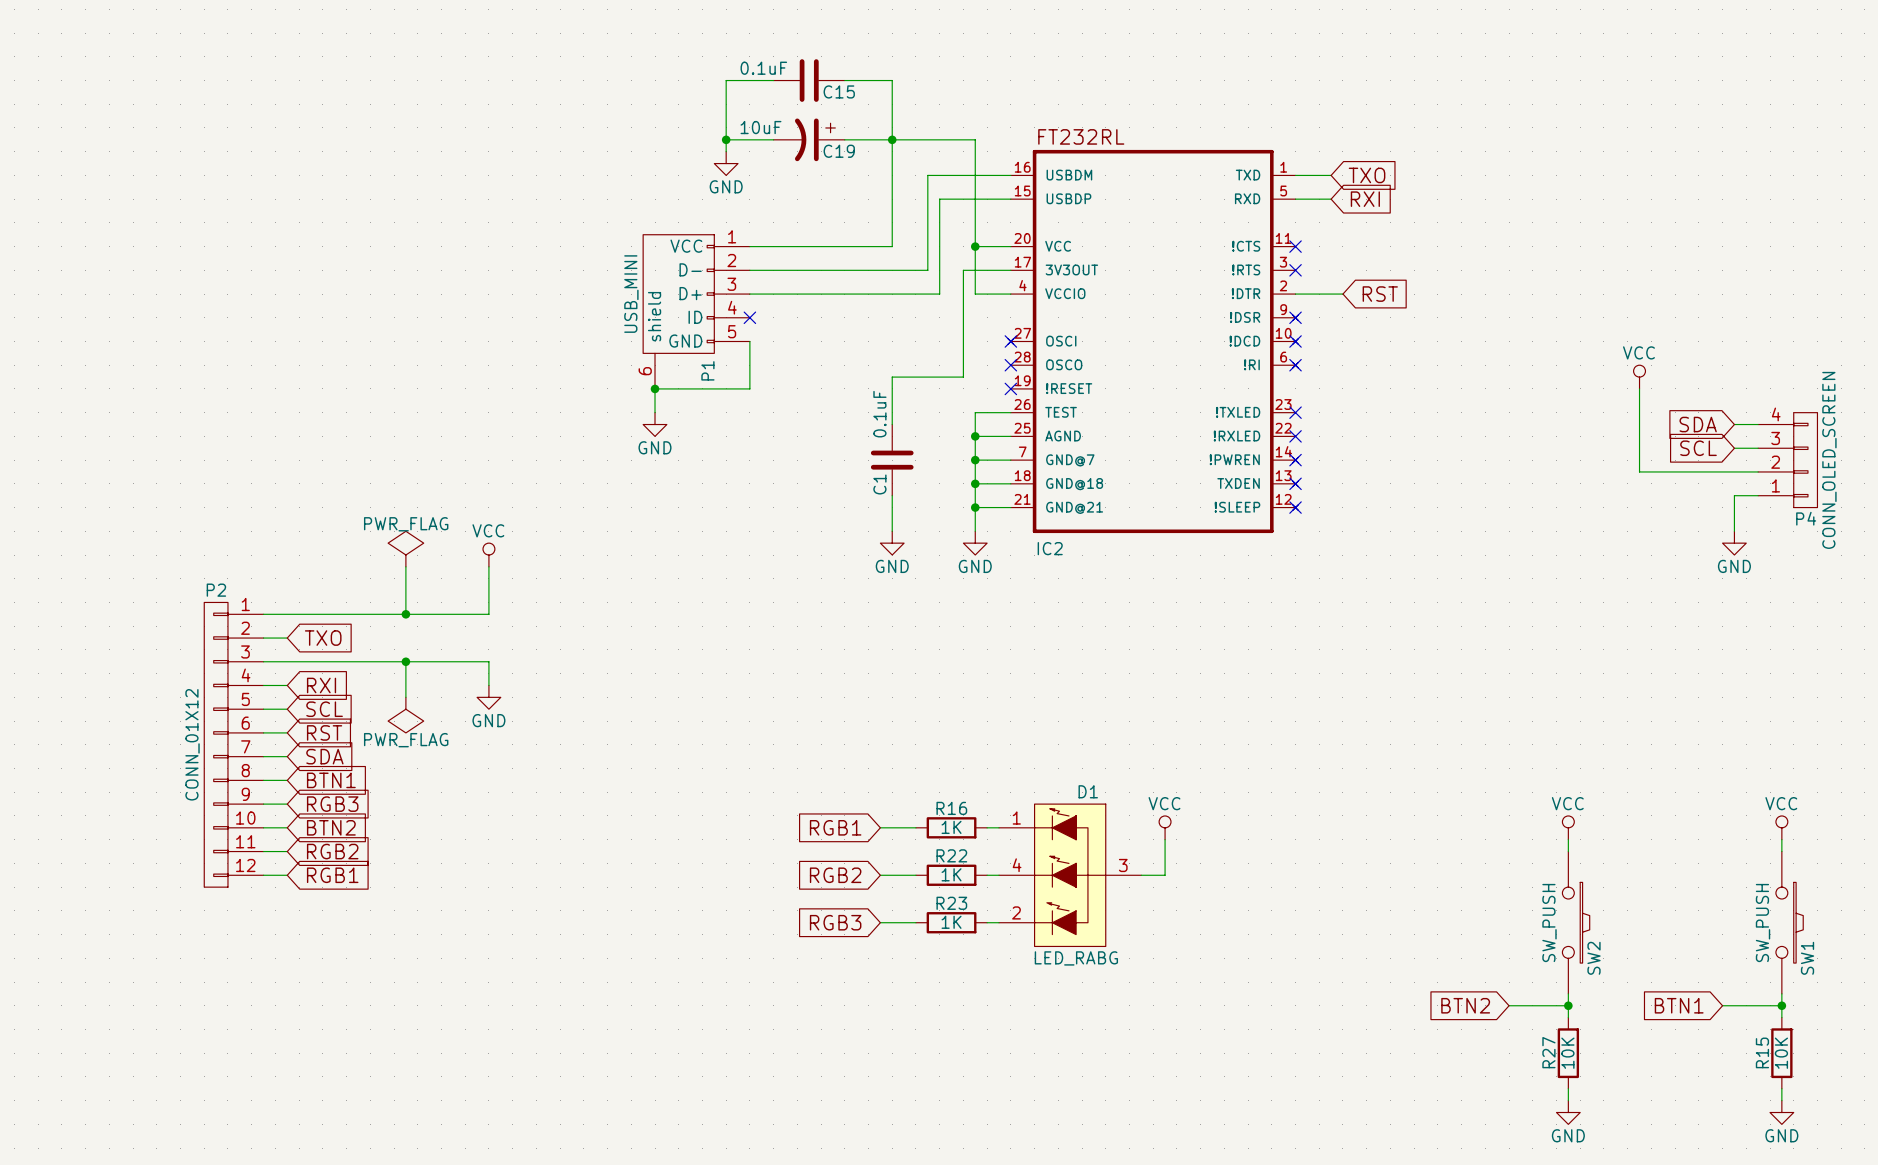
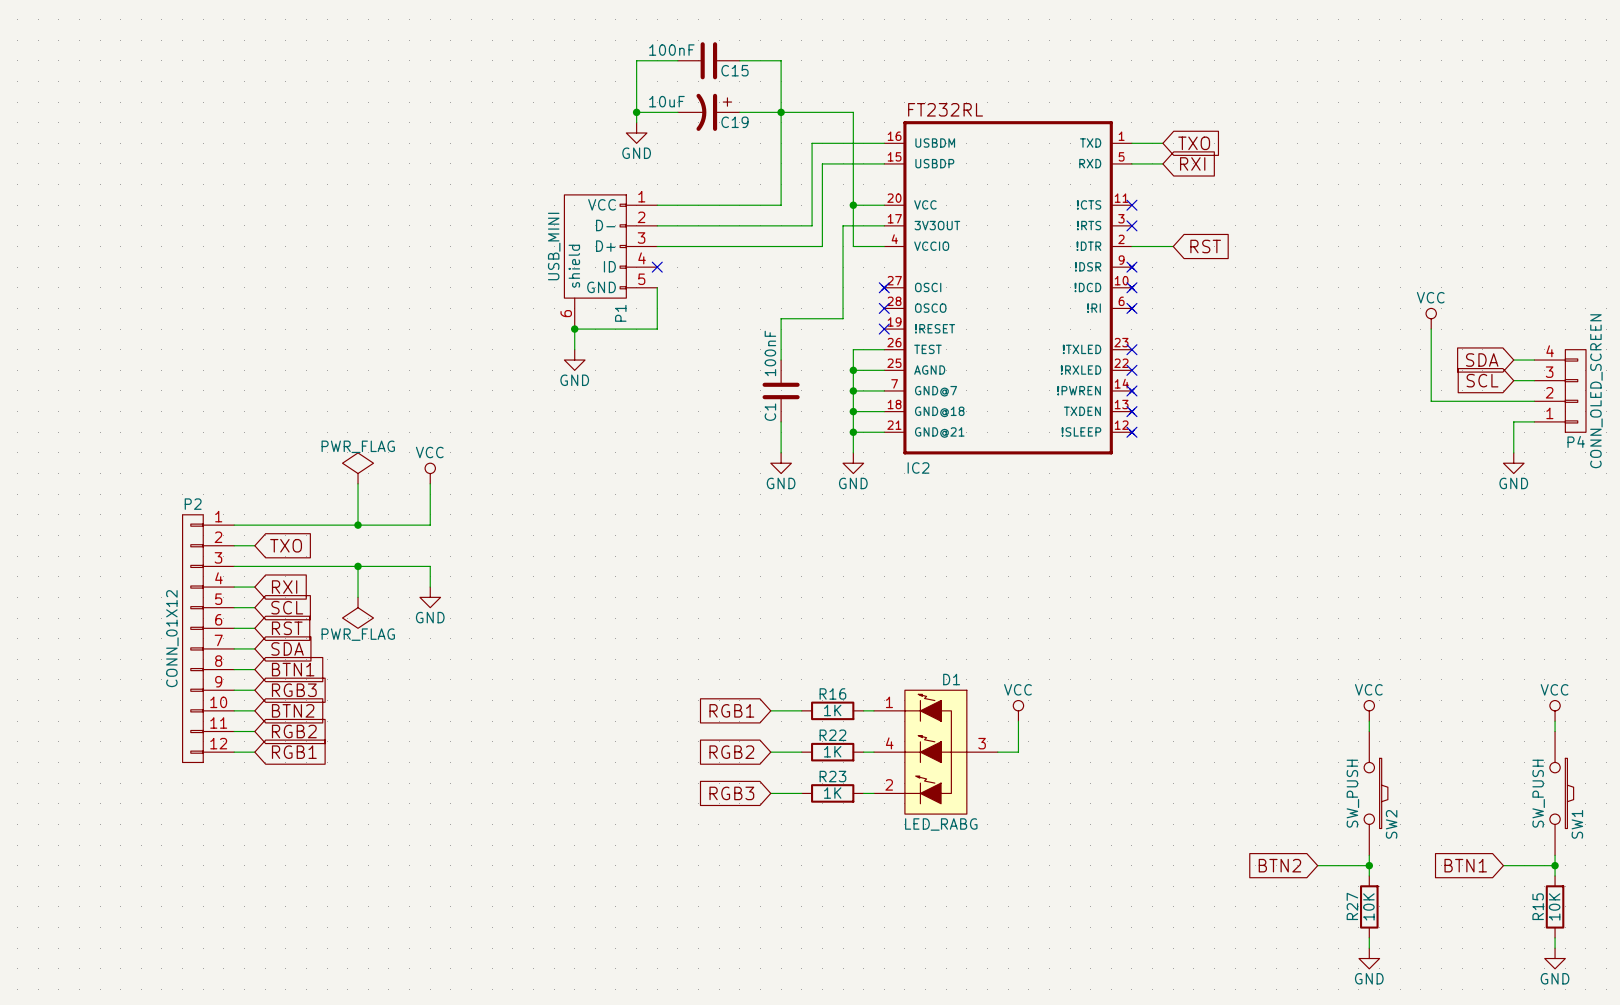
C15 value: 0.1uF (763, 68) -> 100nF (671, 50)
C1 value: 0.1uF (879, 414) -> 100nF (770, 353)

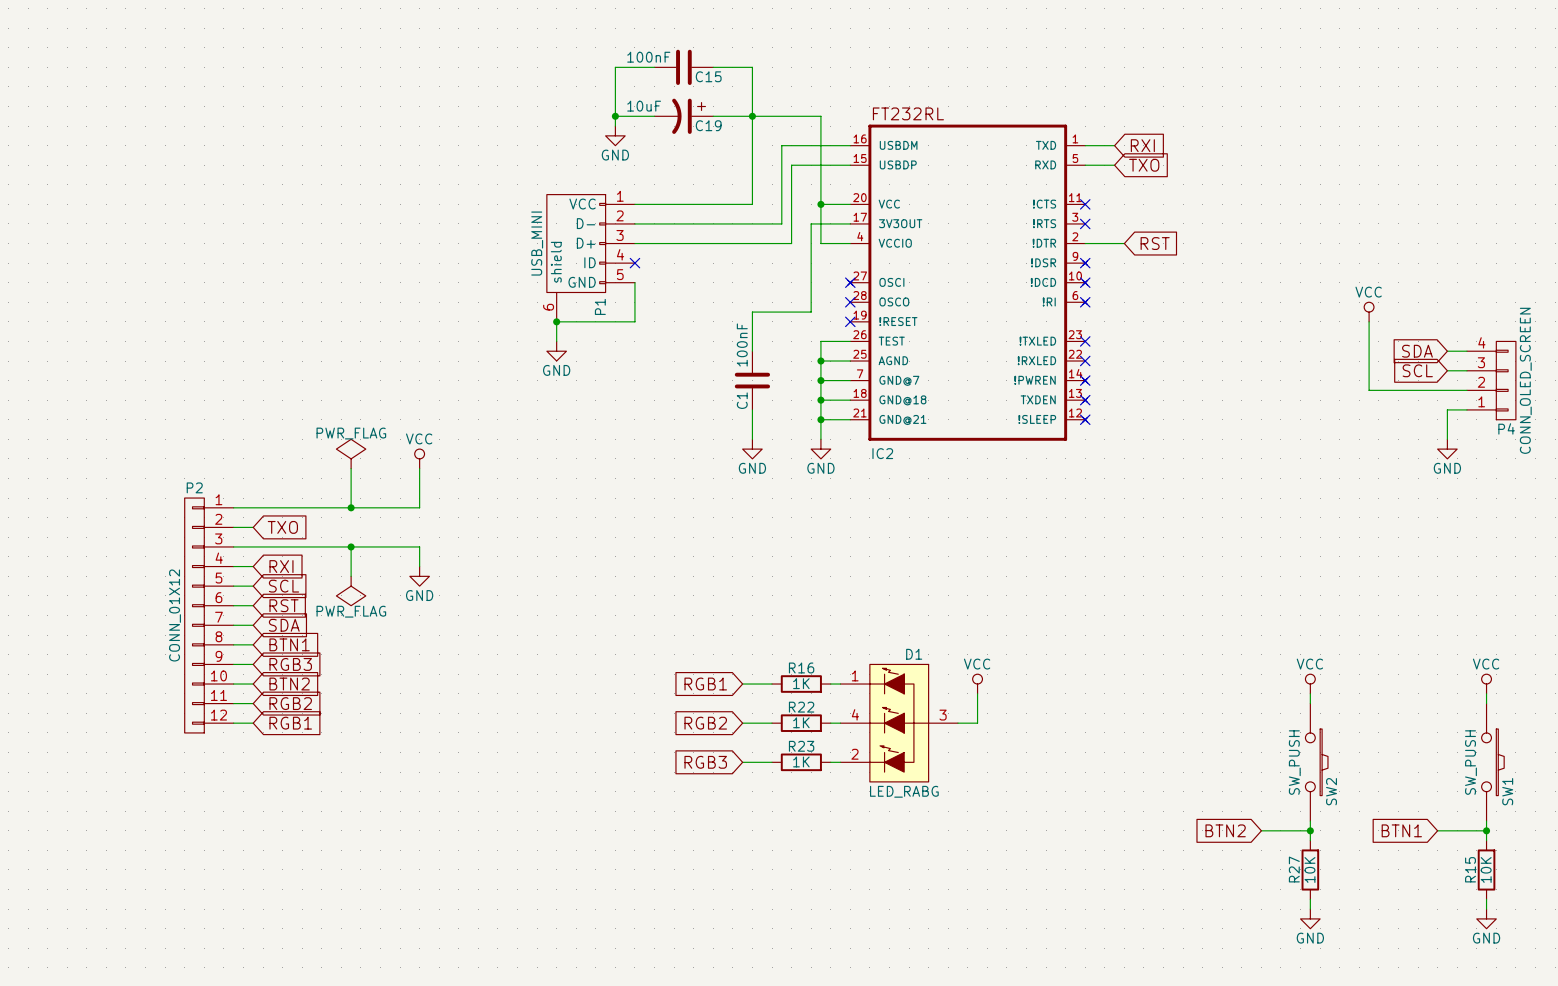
global label: TXO (1194, 143) -> RXI (1142, 145)
global label: RXI (1192, 163) -> TXO (1144, 165)

